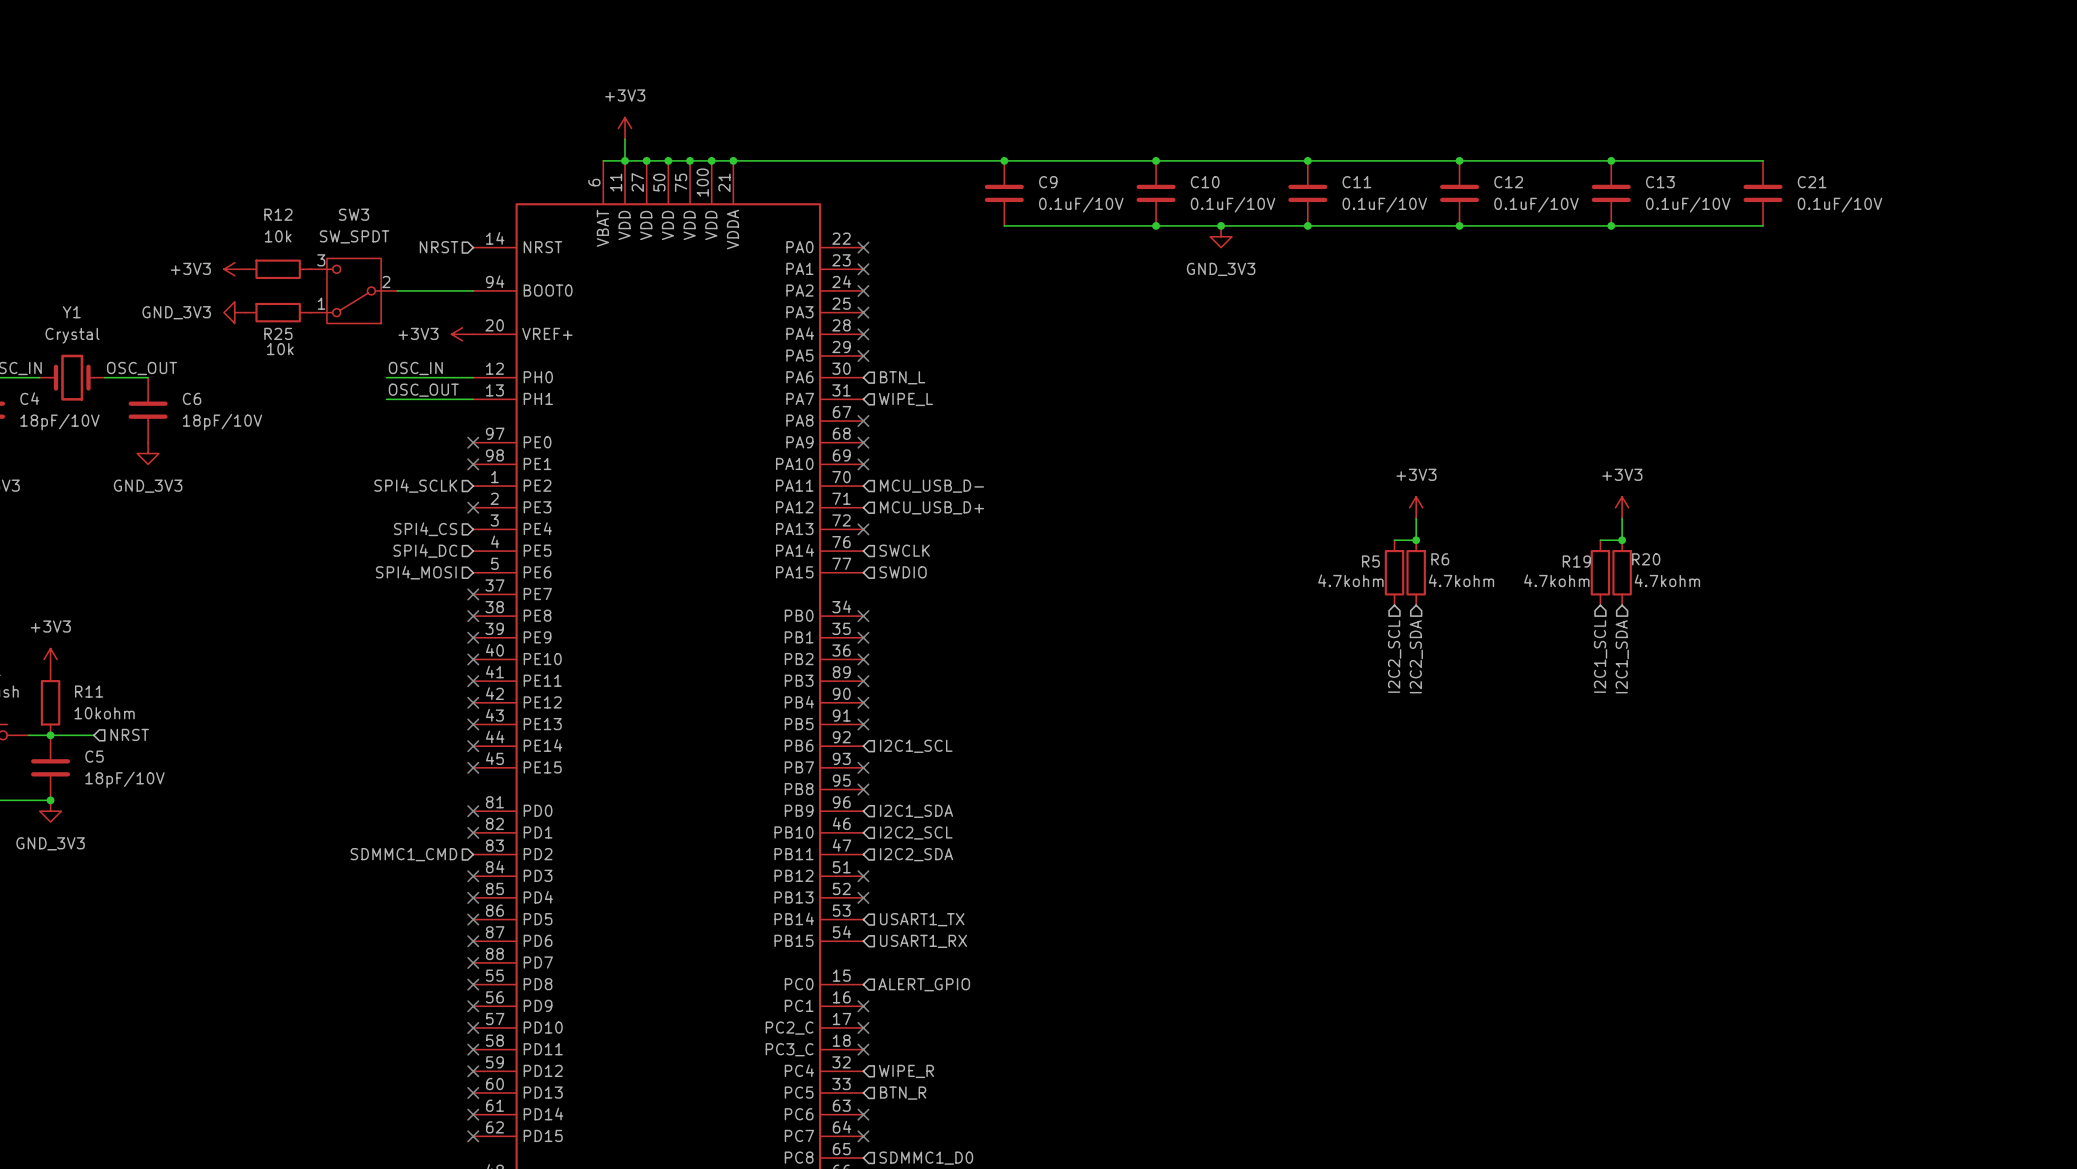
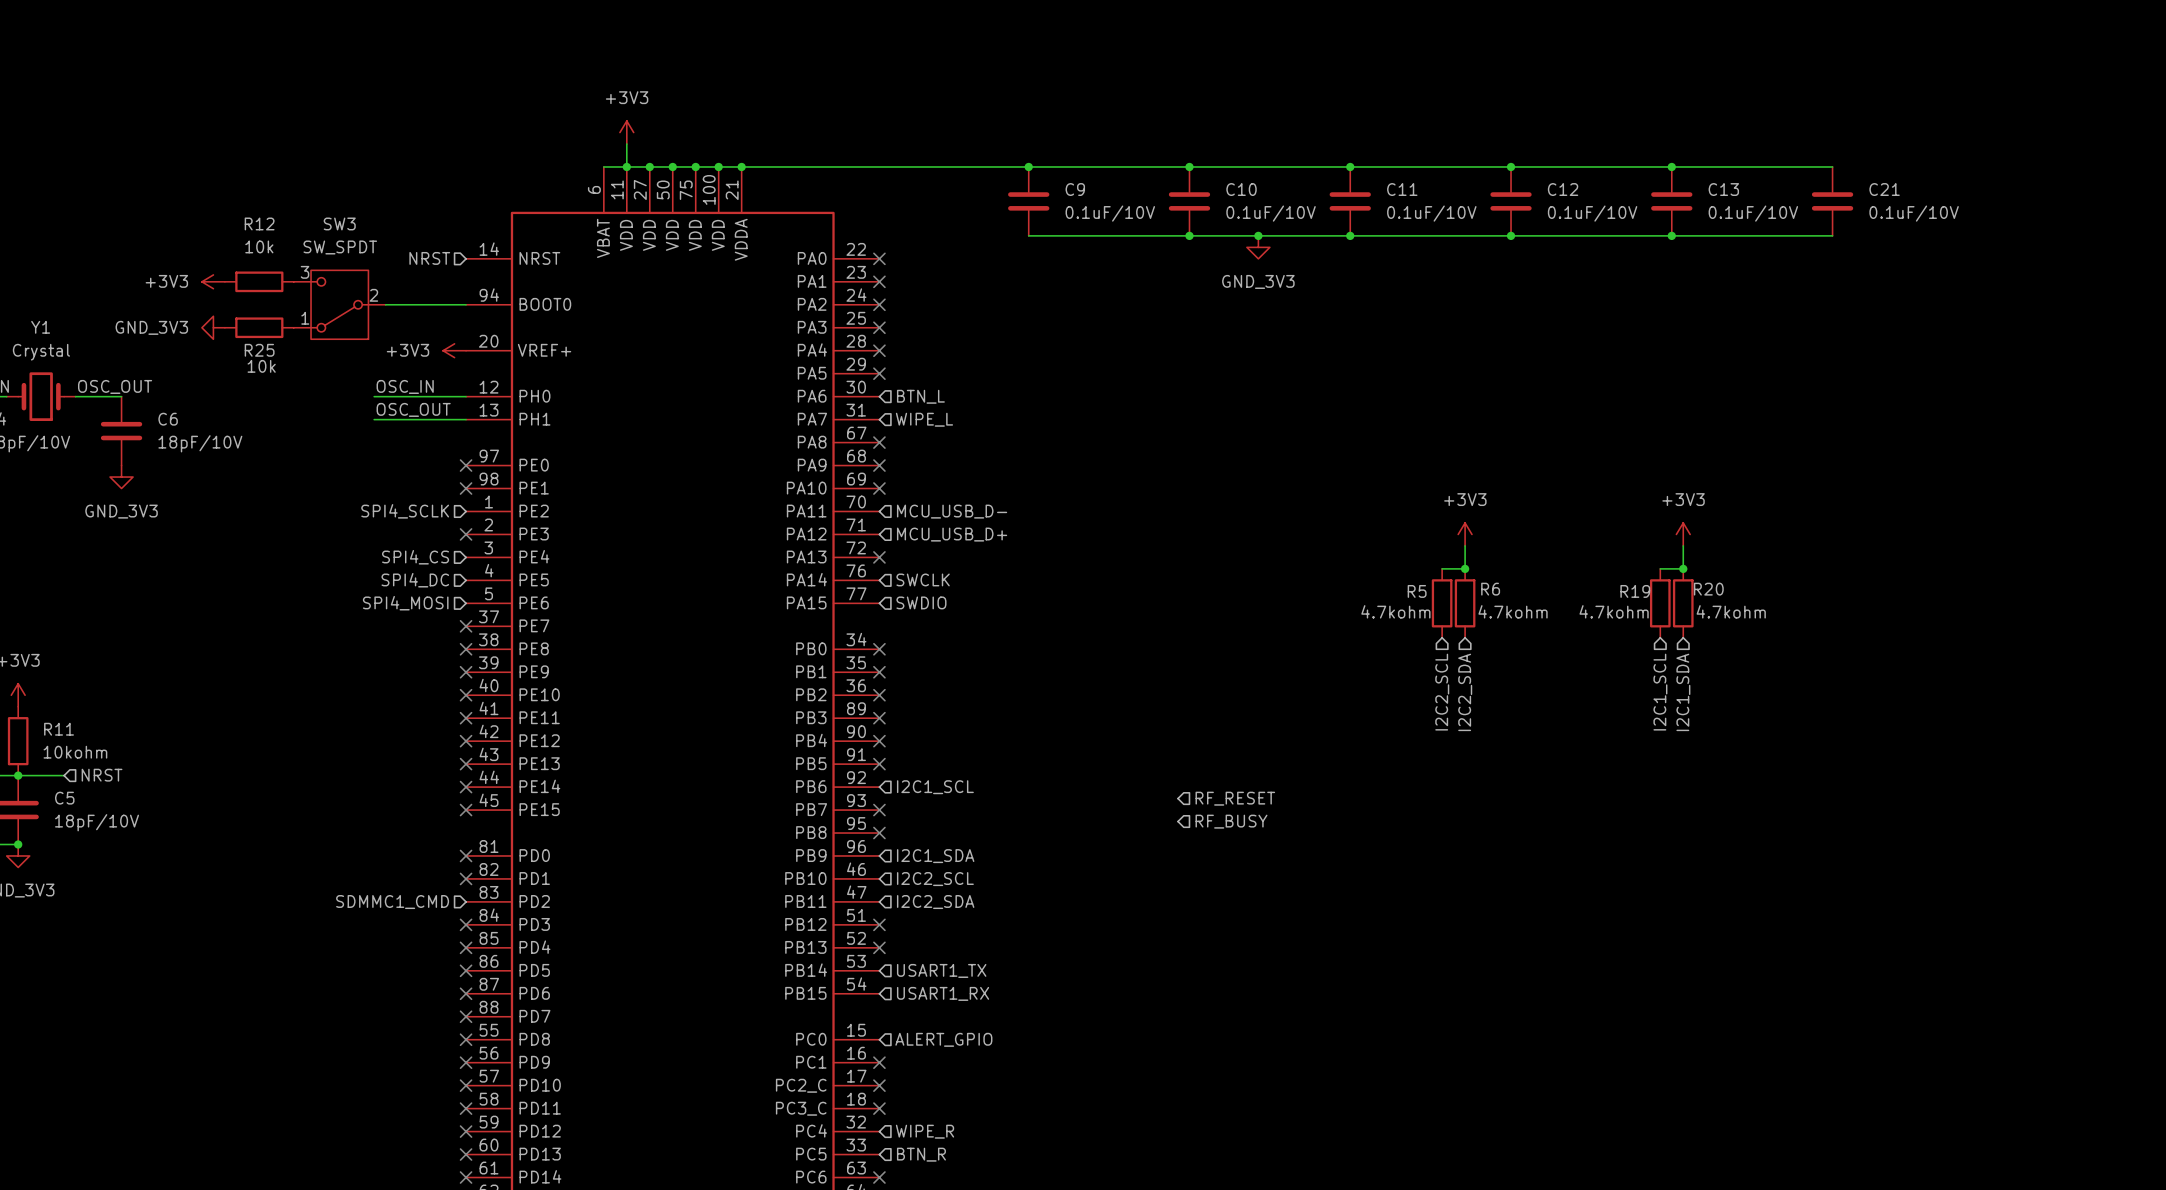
hierarchical label: none -> RF_RESET (1235, 798)
hierarchical label: none -> RF_BUSY (1231, 821)

